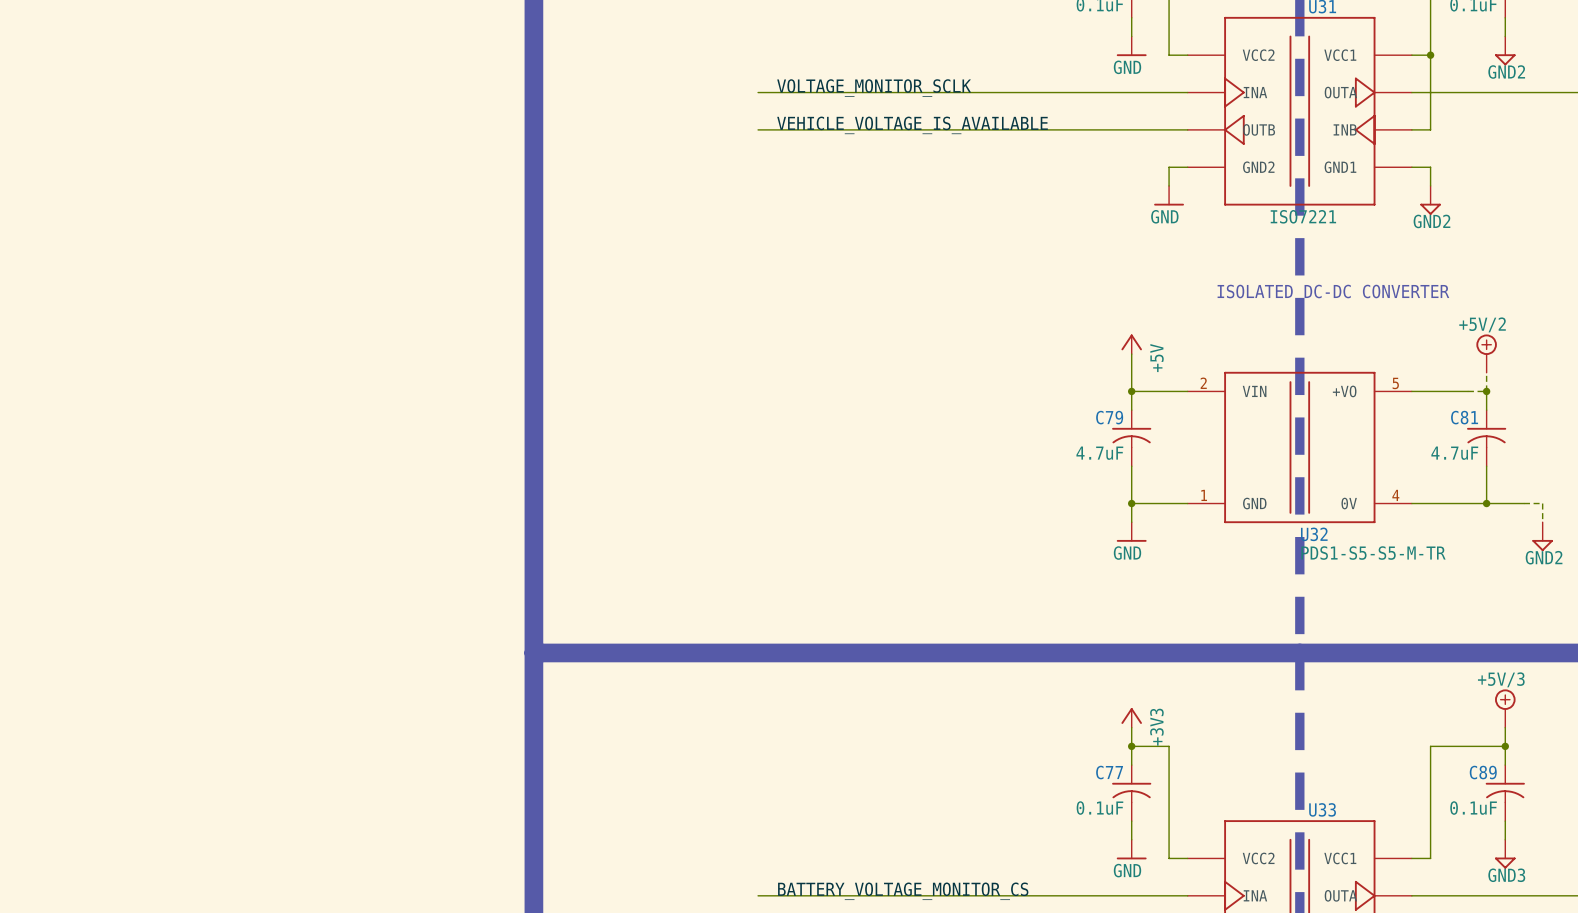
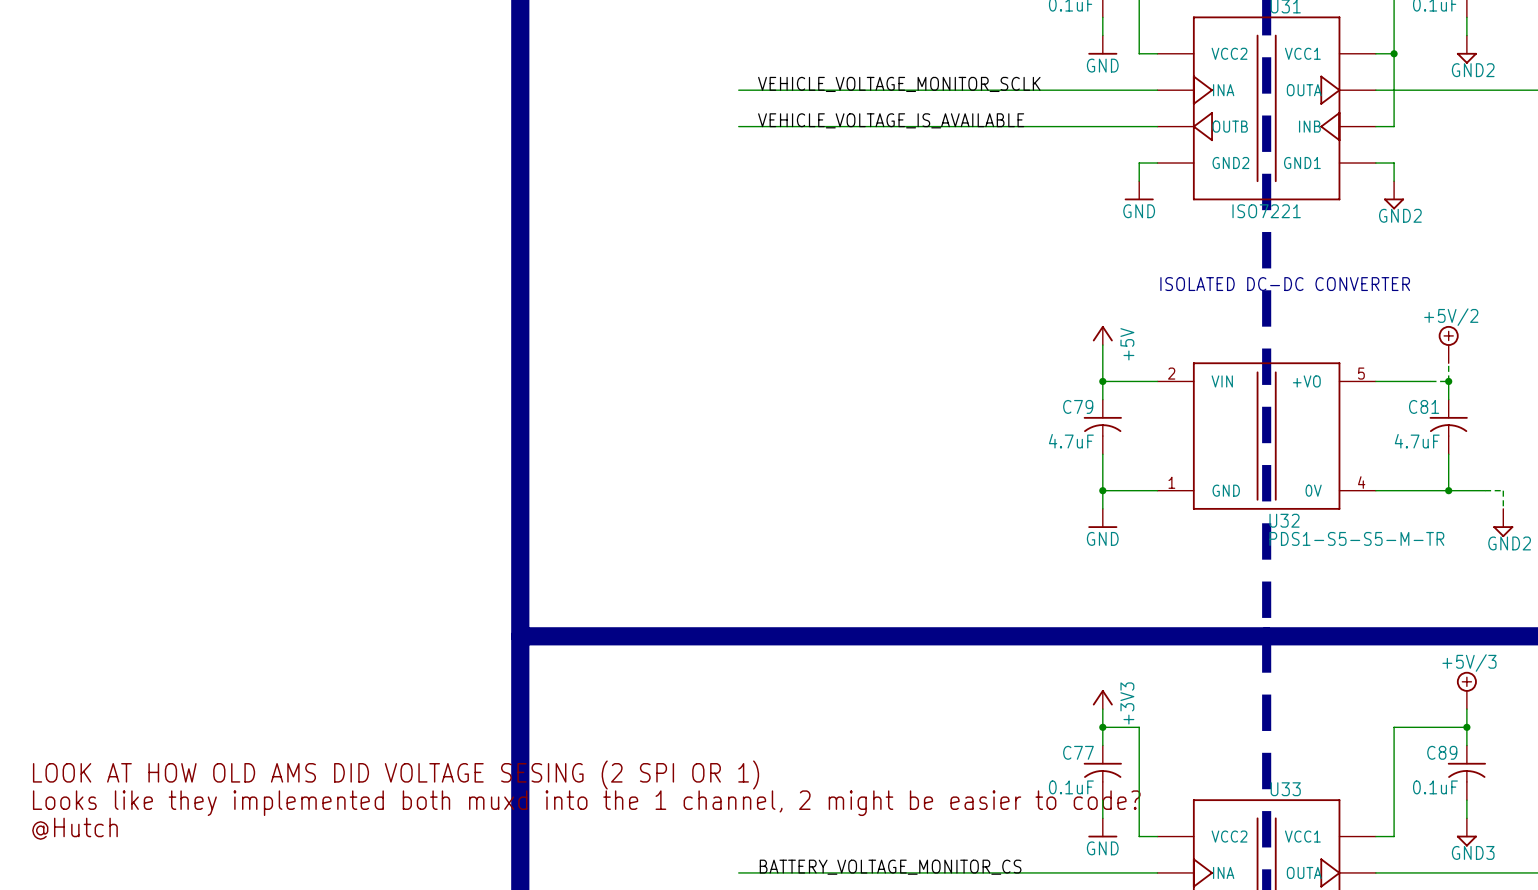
label: VOLTAGE_MONITOR_SCLK (874, 88) -> VEHICLE_VOLTAGE_MONITOR_SCLK (899, 84)
text: none -> LOOK AT HOW OLD AMS DID VOLTAGE SESING (2 SPI OR 1) (396, 775)
text: none -> Looks like they implemented both muxd into the 1 channel, 2 might be easier to code? (586, 803)
text: none -> @Hutch (74, 828)

